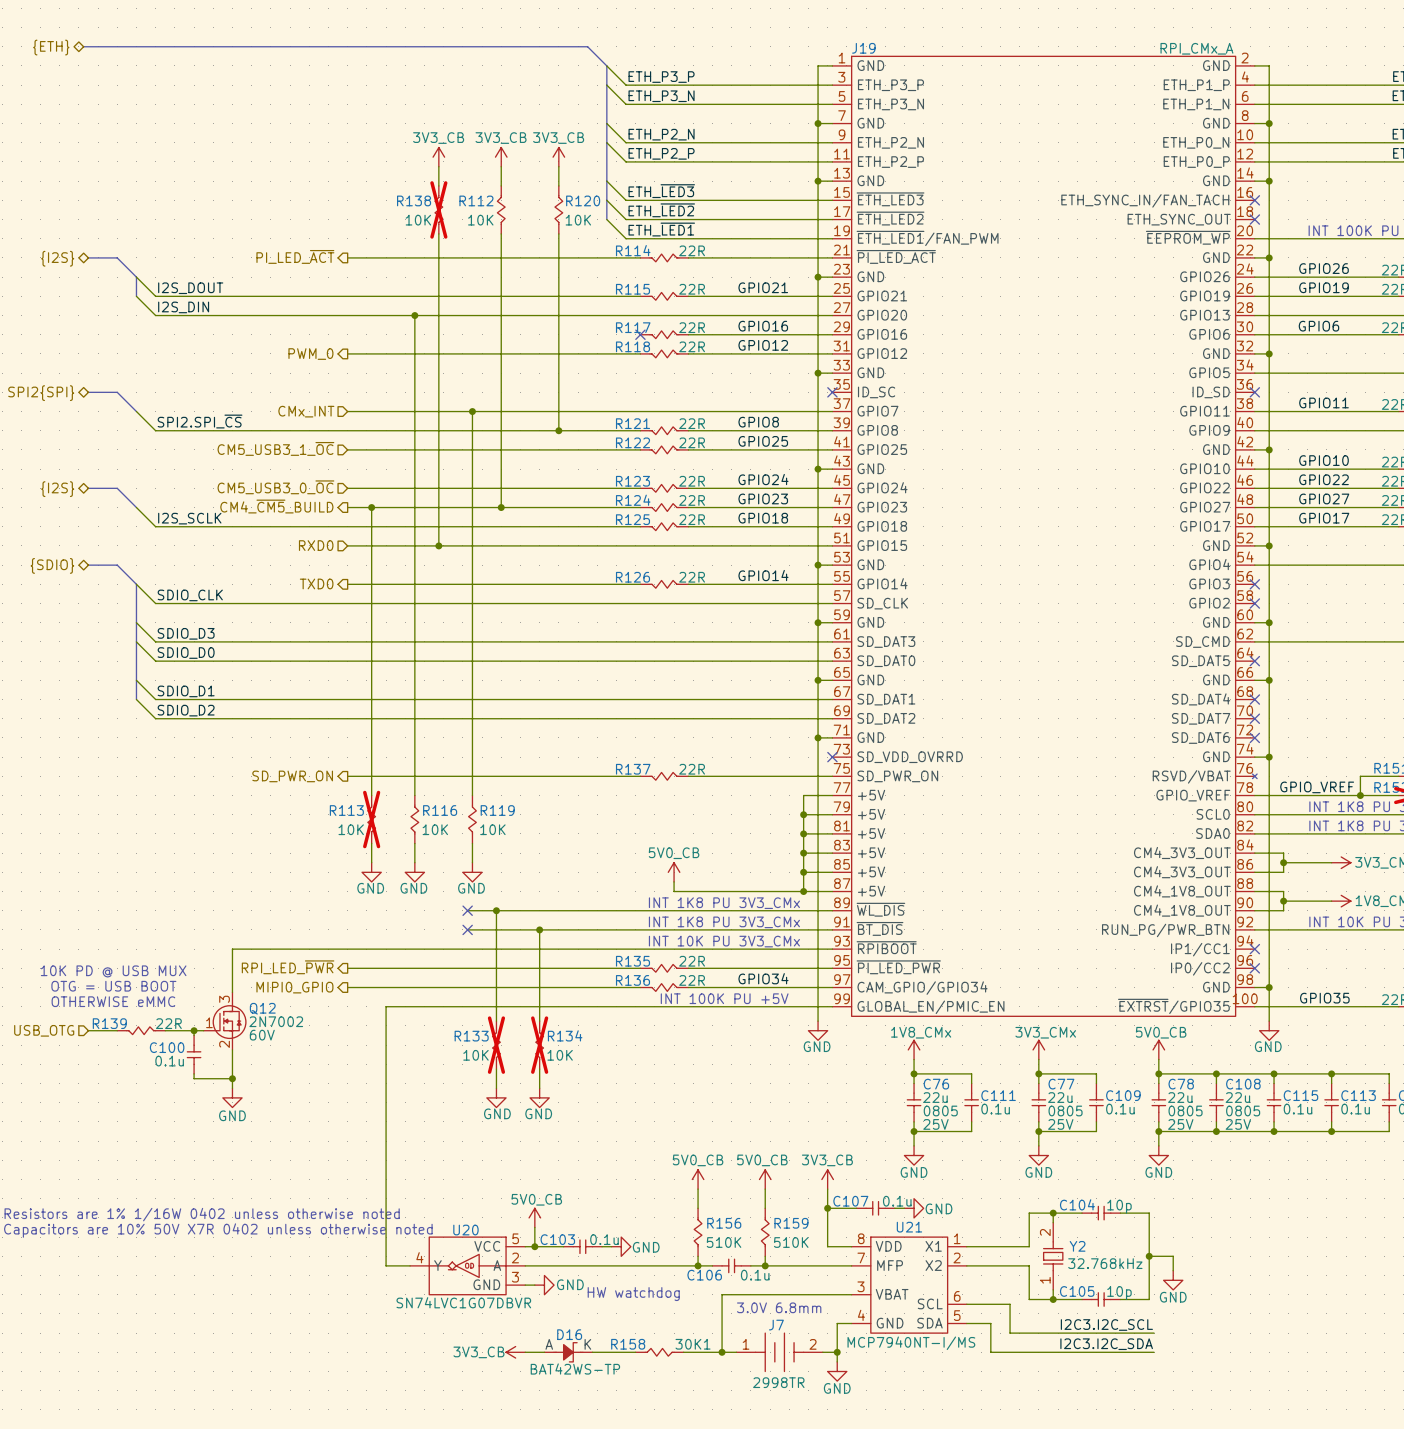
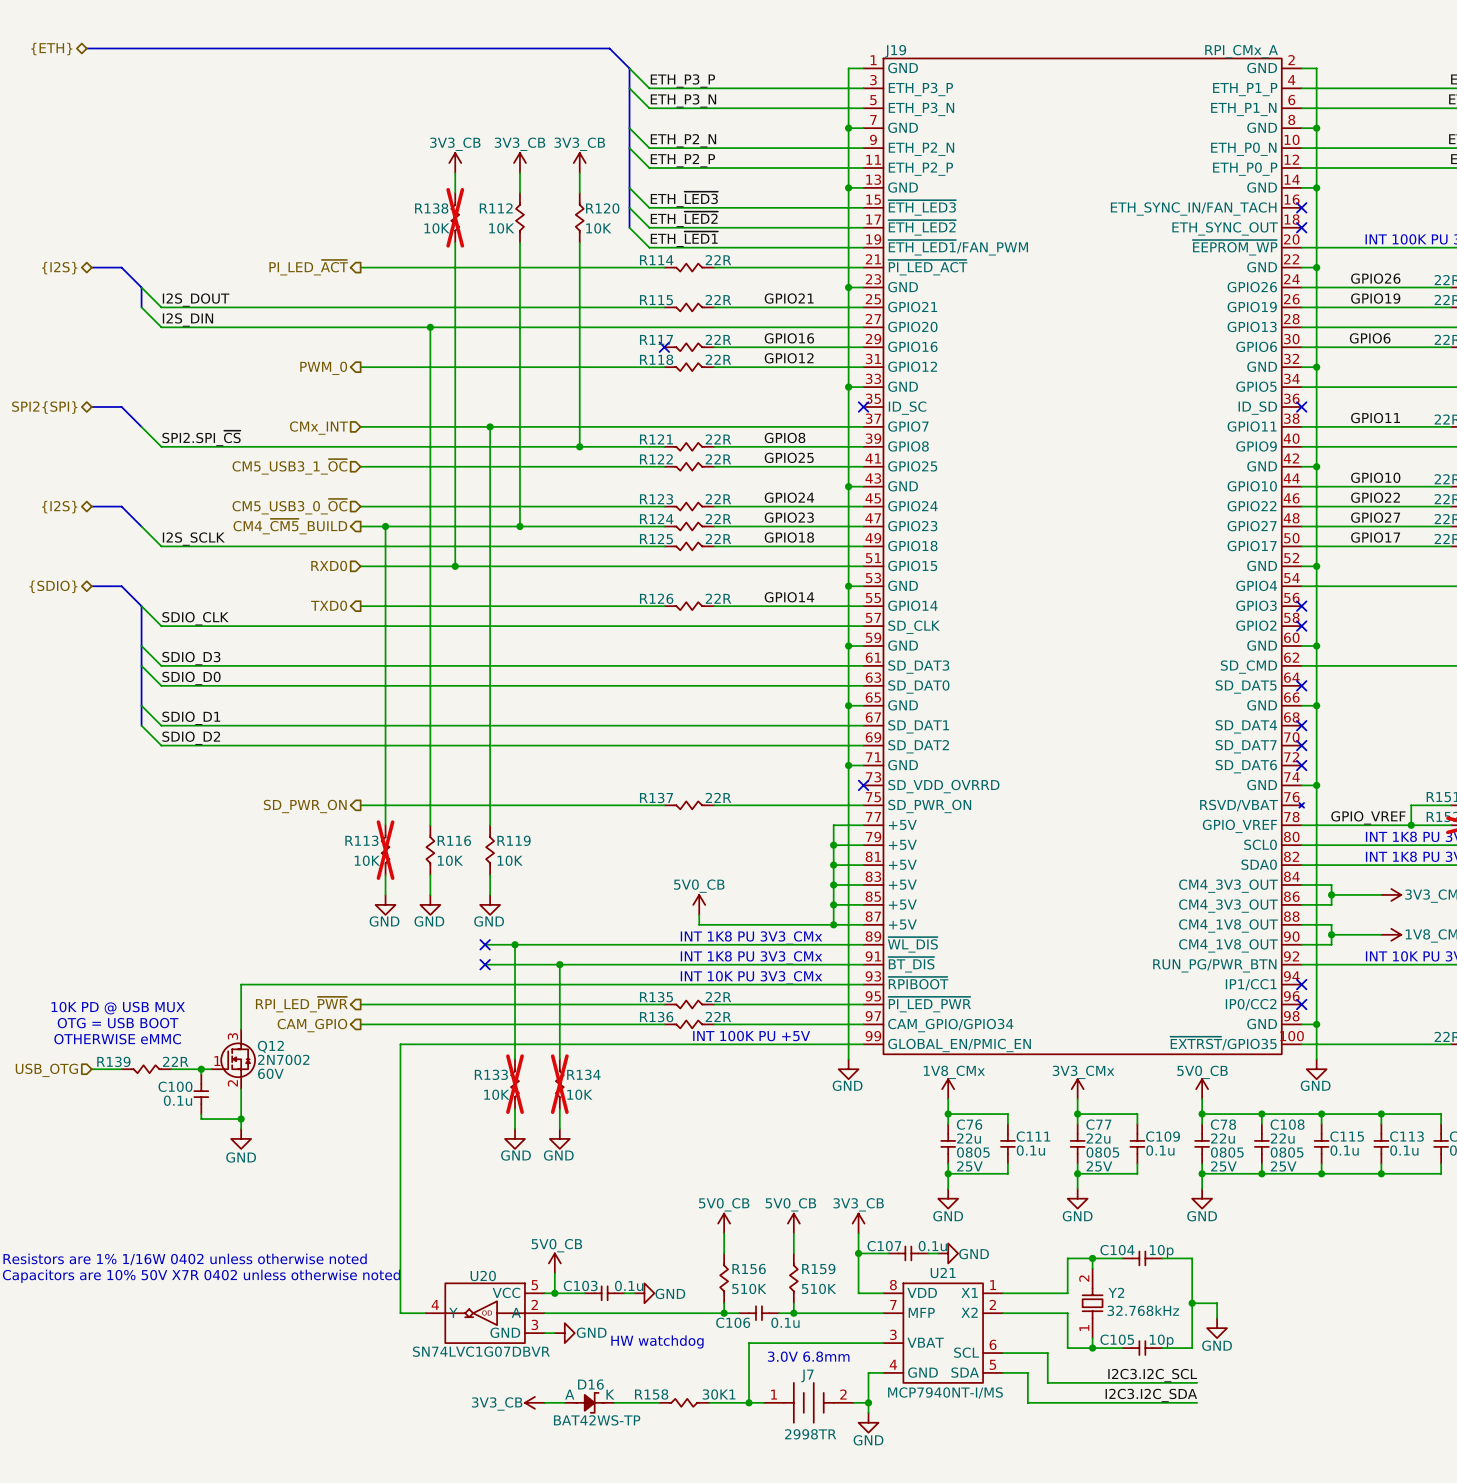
label: GPIO34 (763, 978) -> none
hierarchical label: MIPI0_GPIO (294, 987) -> CAM_GPIO (312, 1025)
label: GPIO35 (1324, 998) -> none

